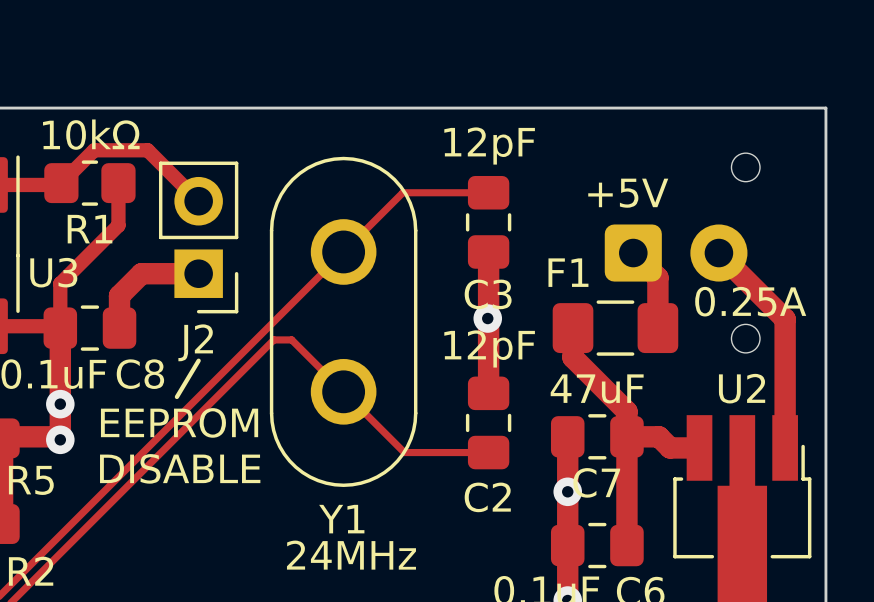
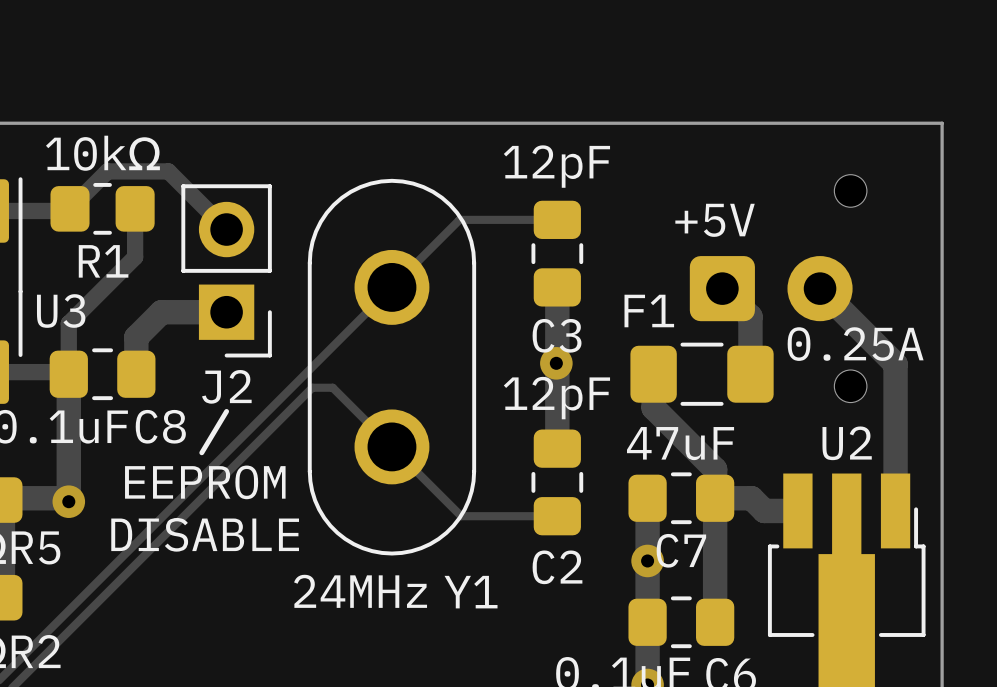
via: (60, 404) -> none
Y1 name position: Y1 (341, 519) -> Y1 (471, 592)
Y1 value position: 24MHz (351, 555) -> 24MHz (360, 591)

